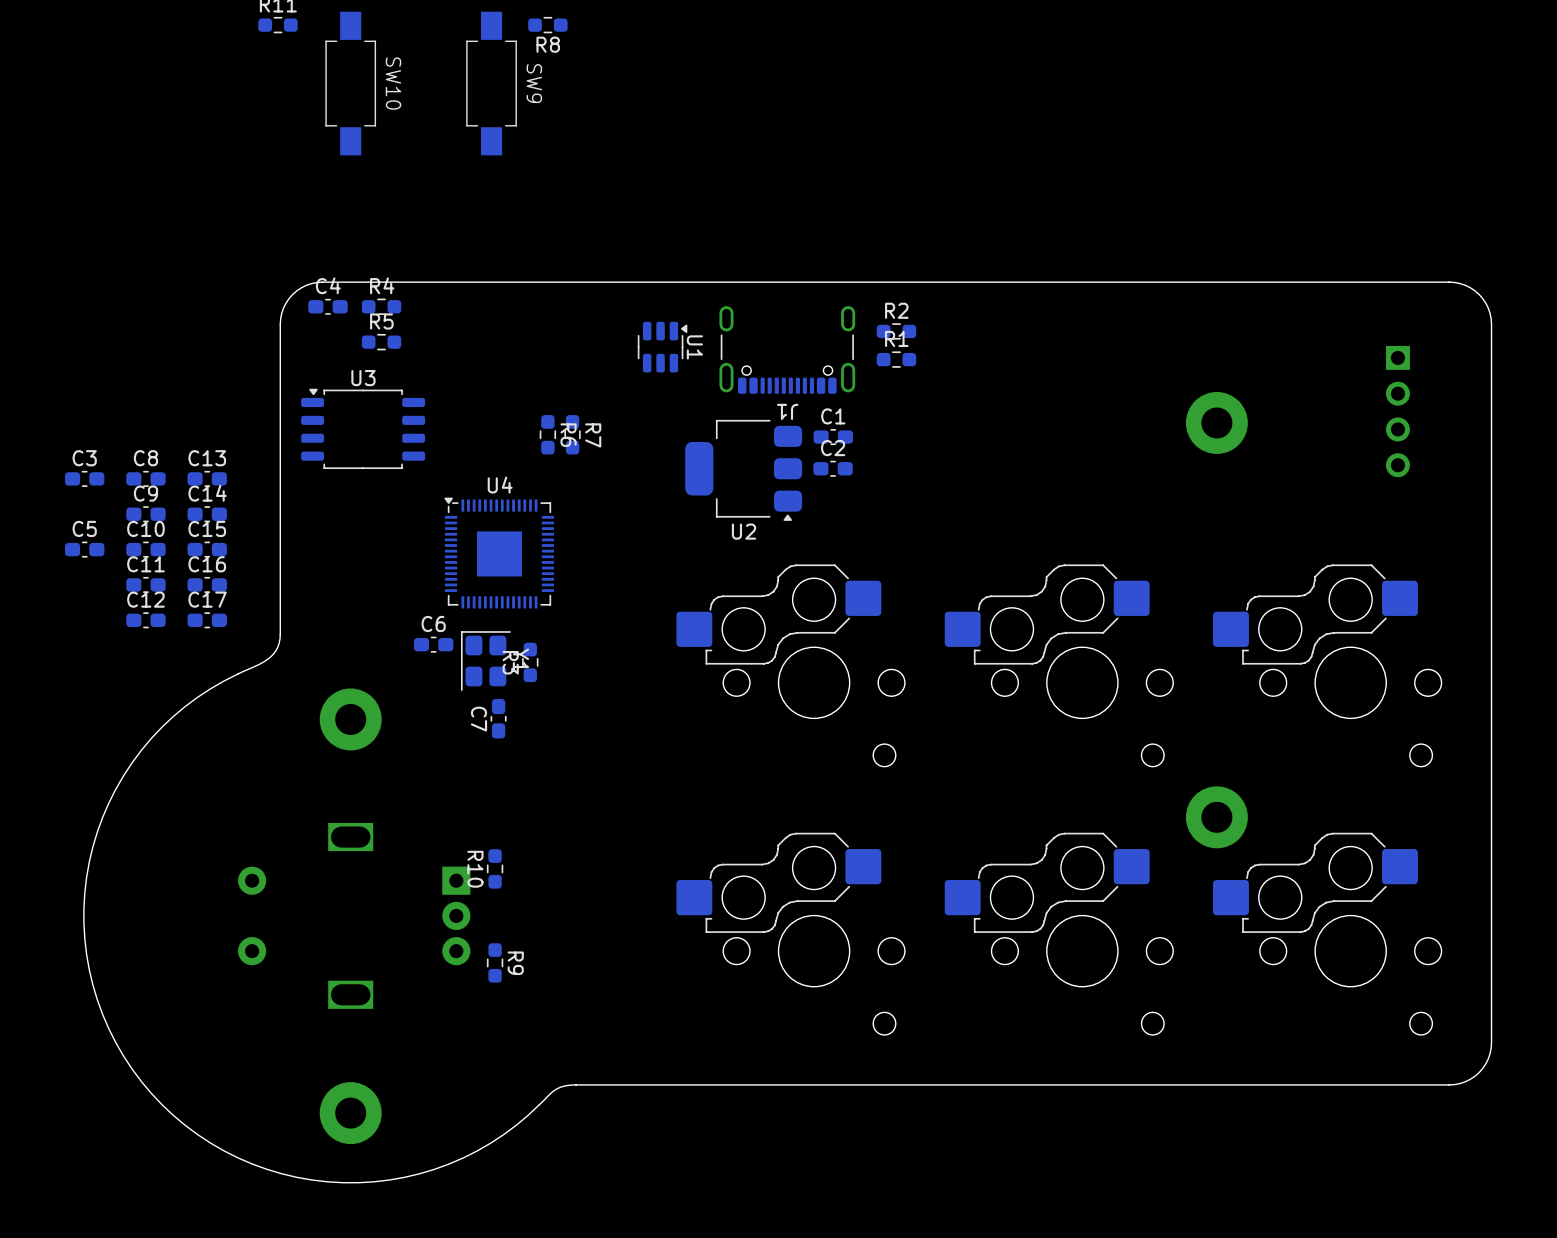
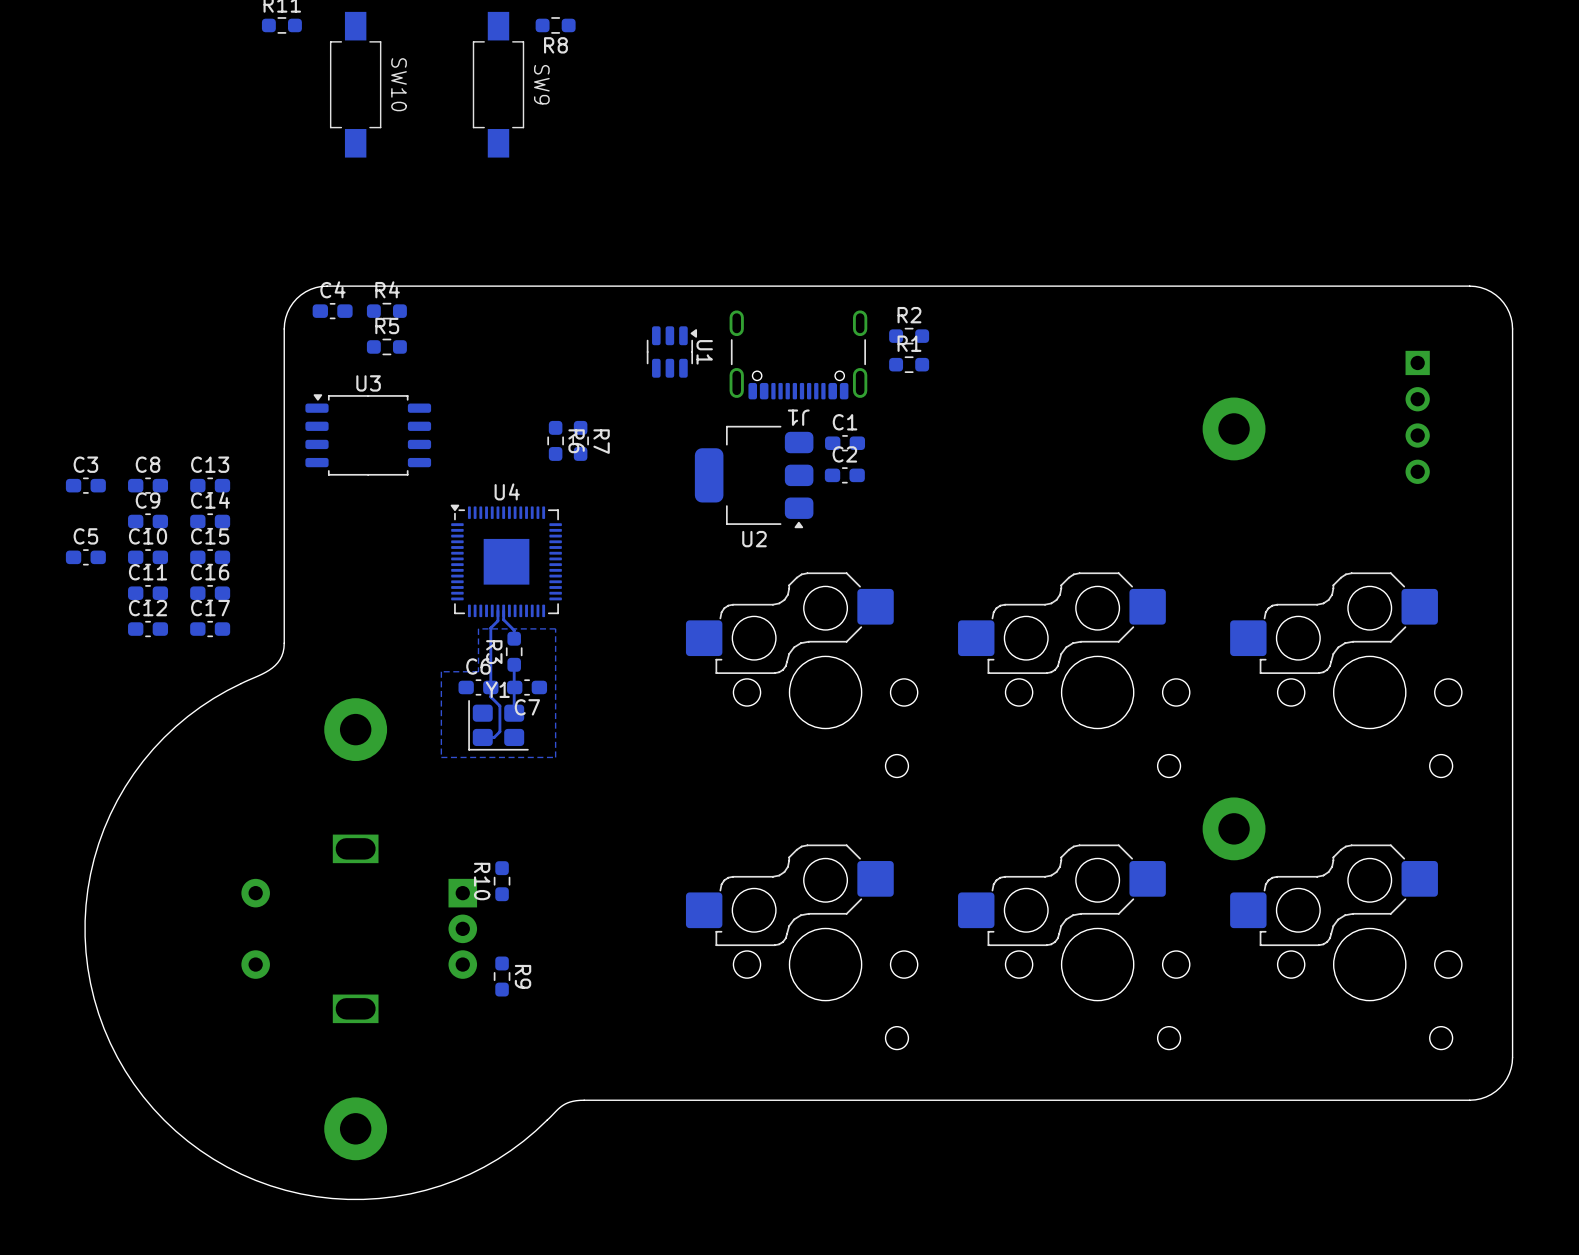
track: none -> (497, 610) (497, 620) (490, 628) (490, 696) (499, 706) (499, 731) (494, 737) (482, 737)
track: none -> (503, 610) (503, 619) (514, 630) (514, 638)
zone outline: none -> (555, 628) (478, 628) (478, 671) (441, 671) (441, 757) (555, 757) (555, 628)
C6 position: (433, 644) -> (478, 687)
track: none -> (514, 664) (514, 713)
Y1 rotation: 0° (485, 661) -> 90° counterclockwise (498, 725)
Y1 position: (485, 661) -> (498, 725)
R3 position: (530, 662) -> (514, 651)
C7 rotation: 0° (498, 718) -> 90° clockwise (527, 687)
C7 position: (498, 718) -> (527, 687)
C7 name position: C7 (478, 719) -> C7 (527, 707)

